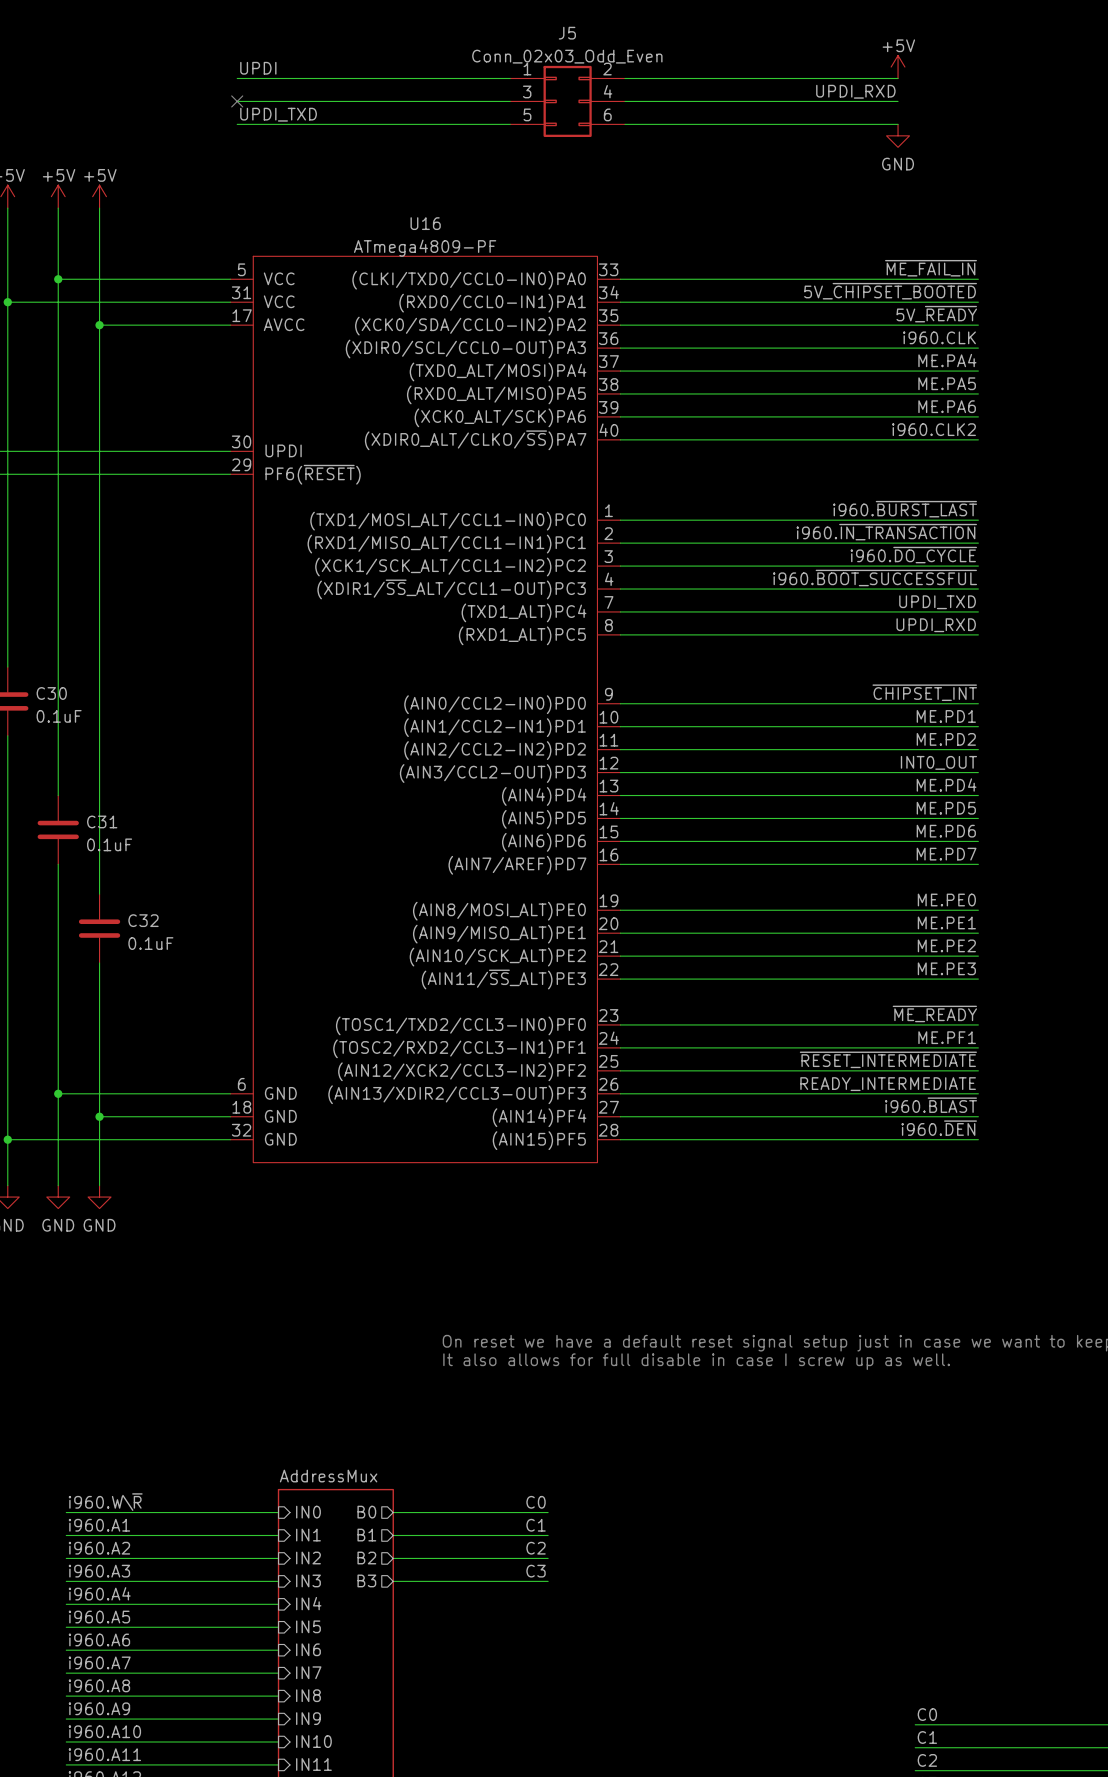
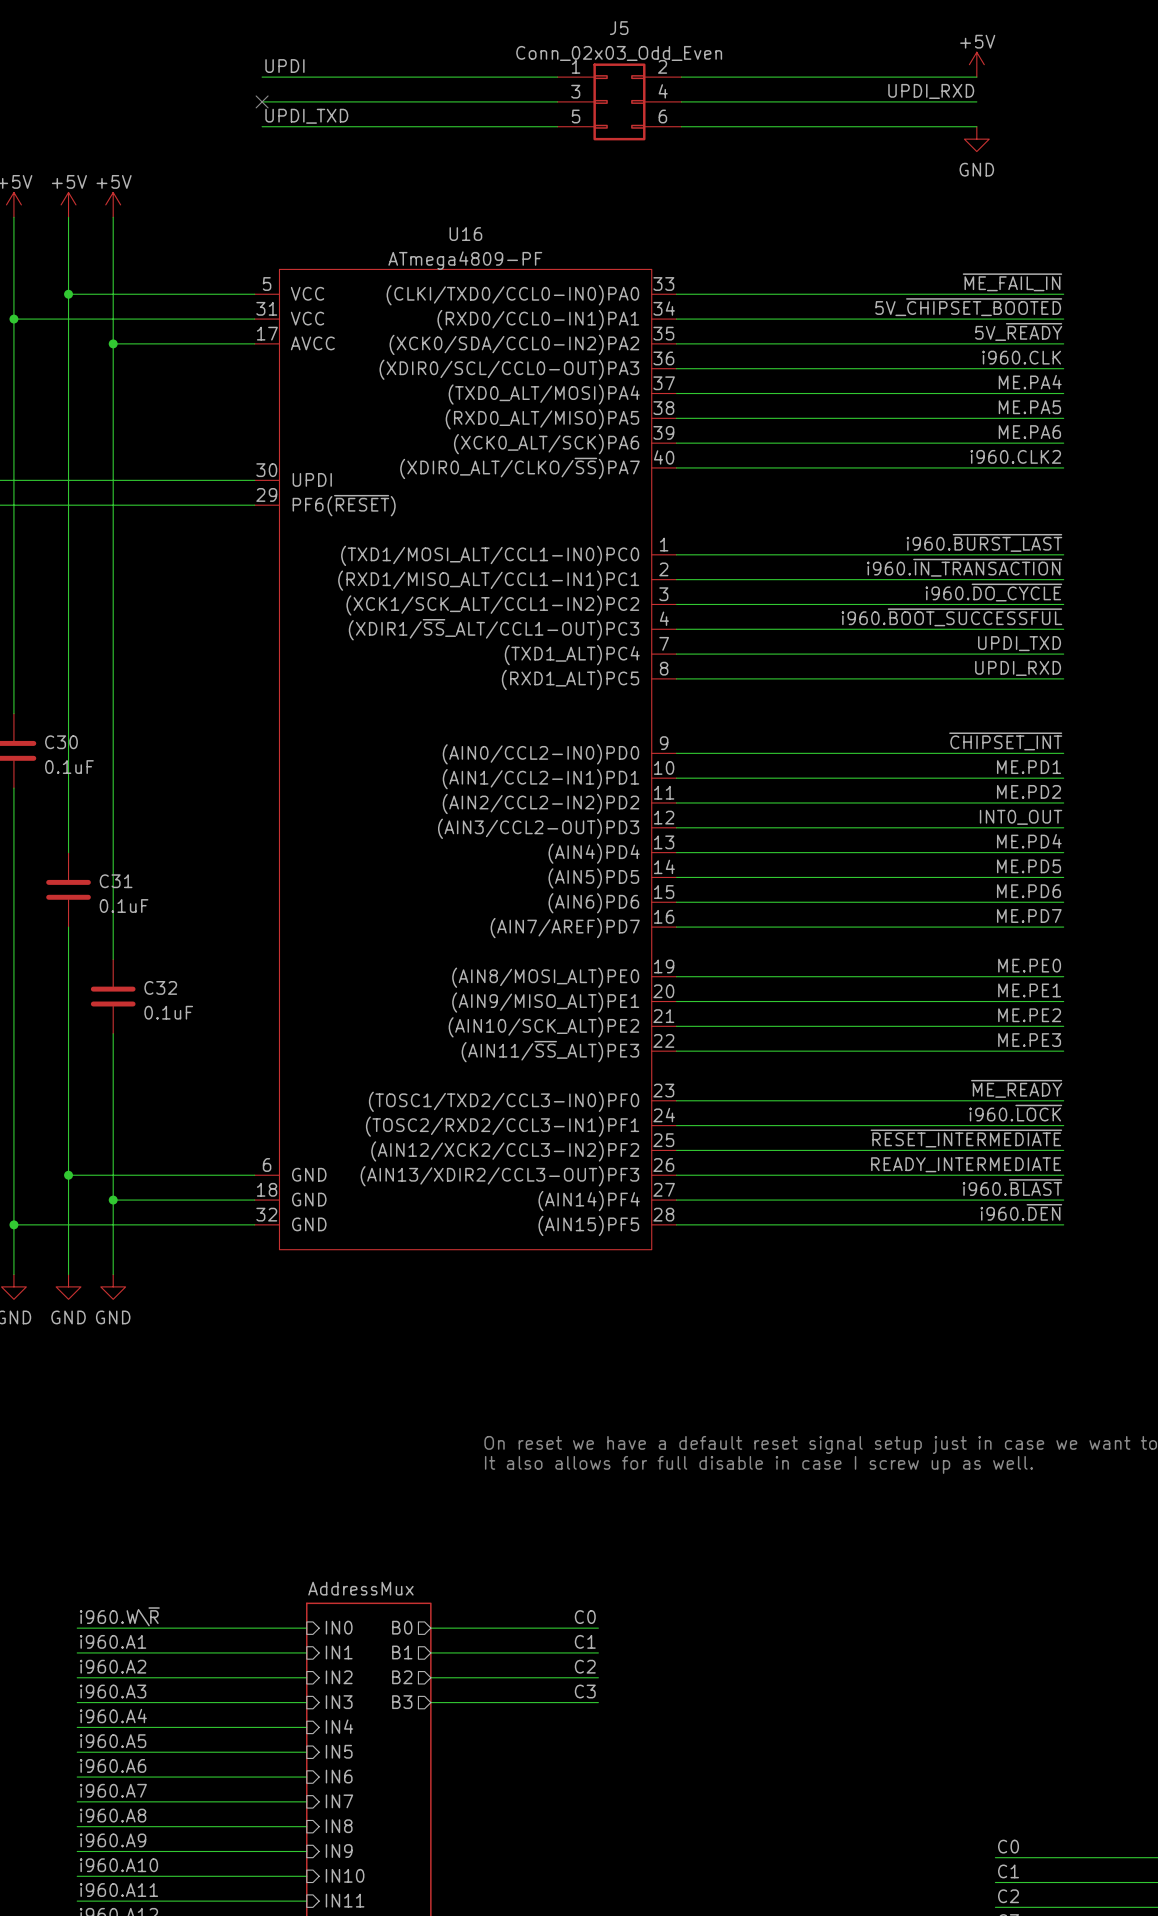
label: ME.PF1 (947, 1037) -> i960.~{LOCK} (1015, 1113)

